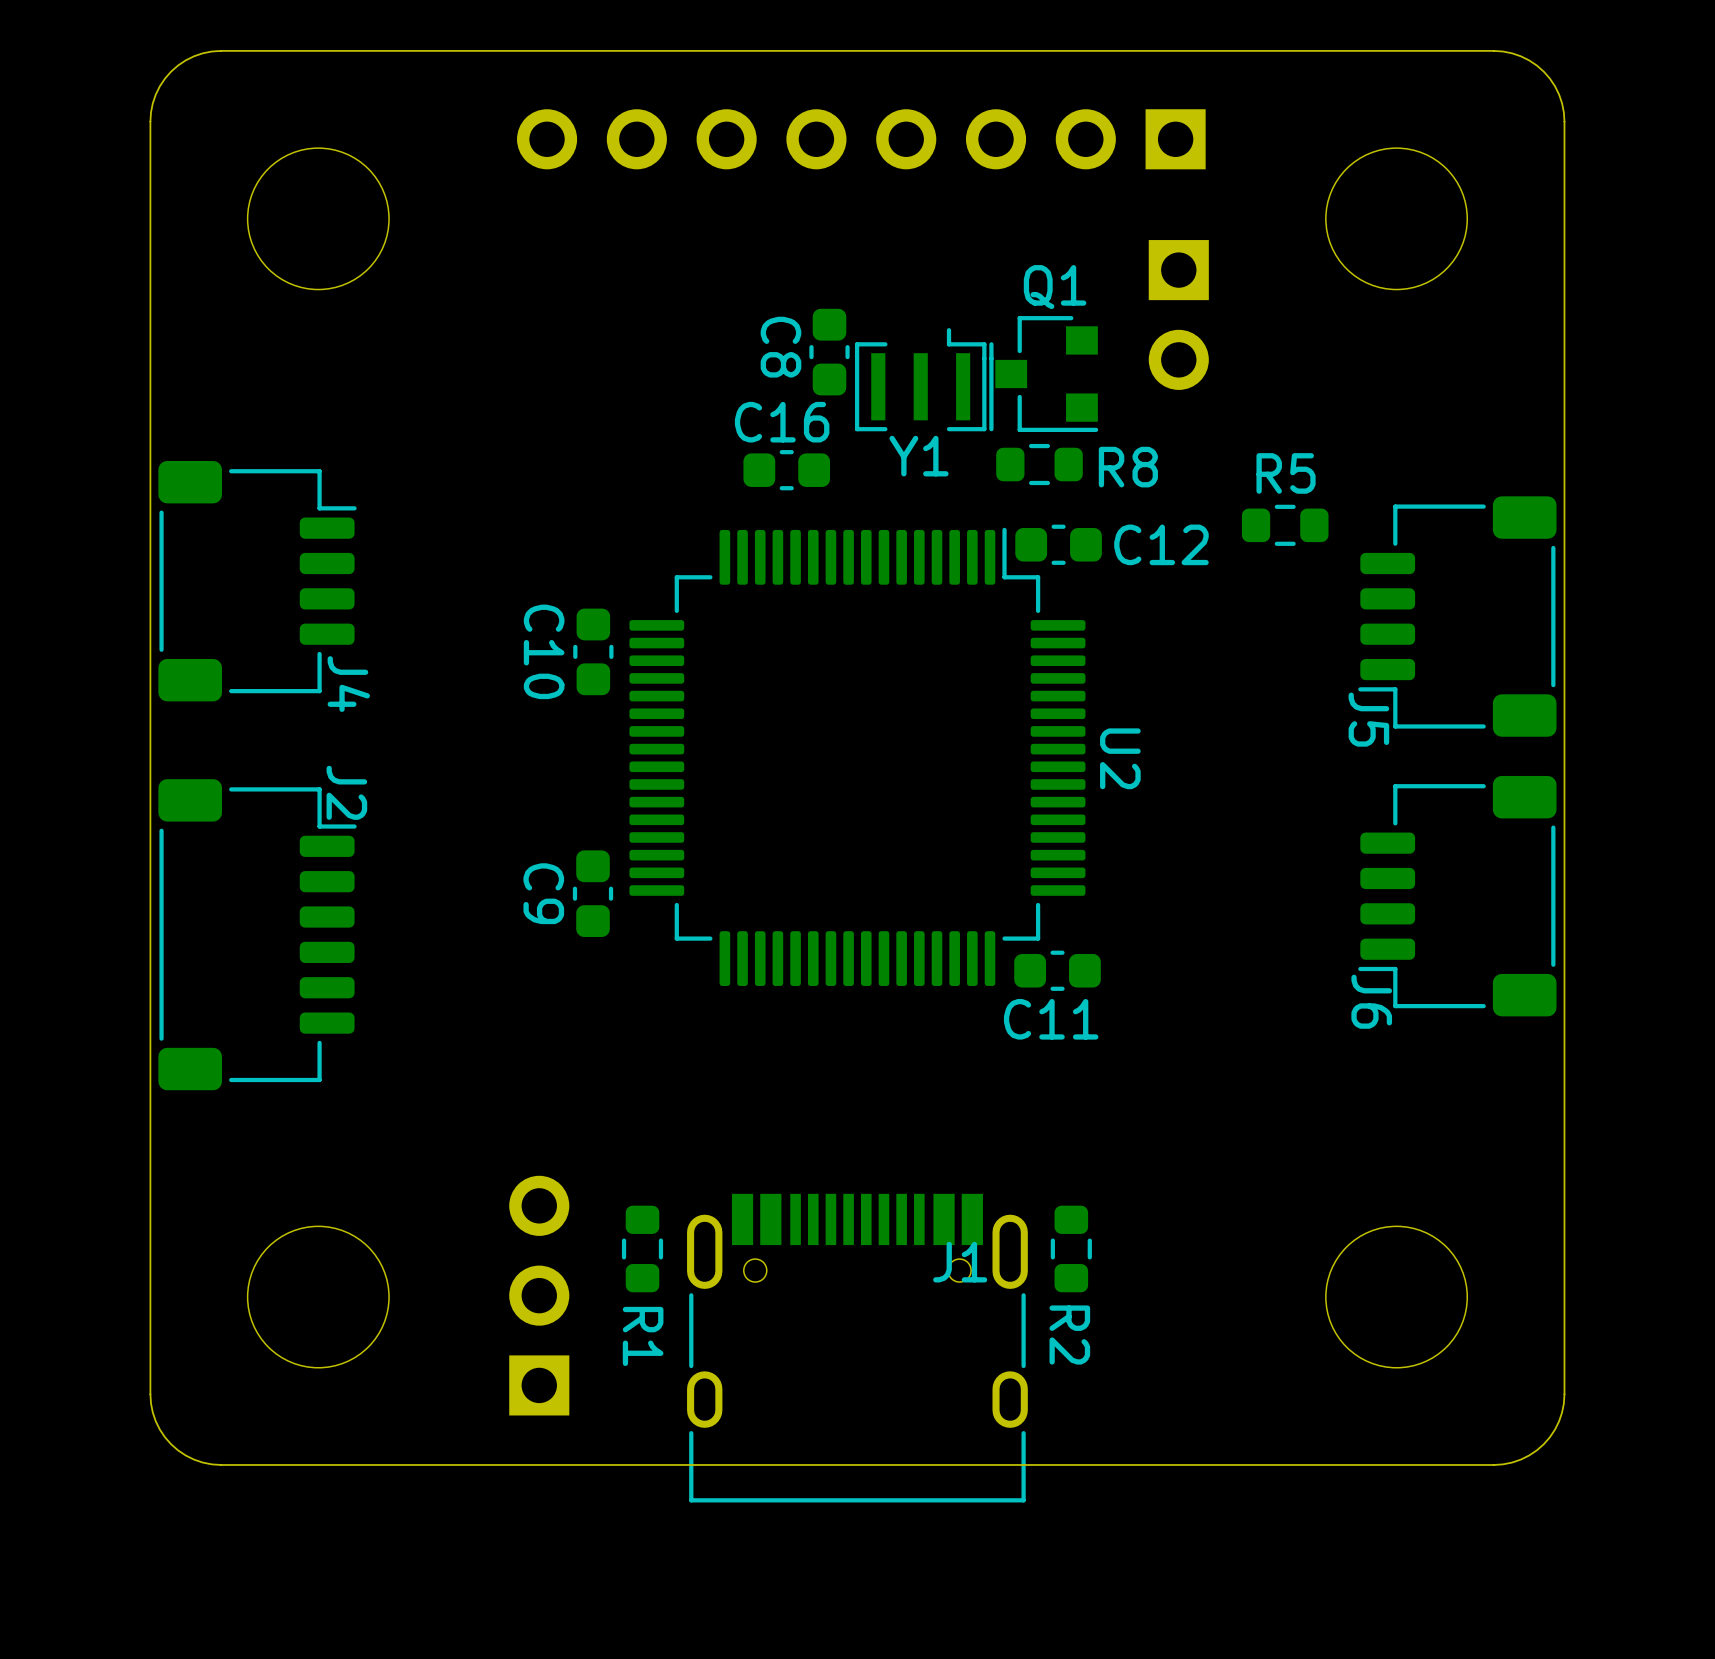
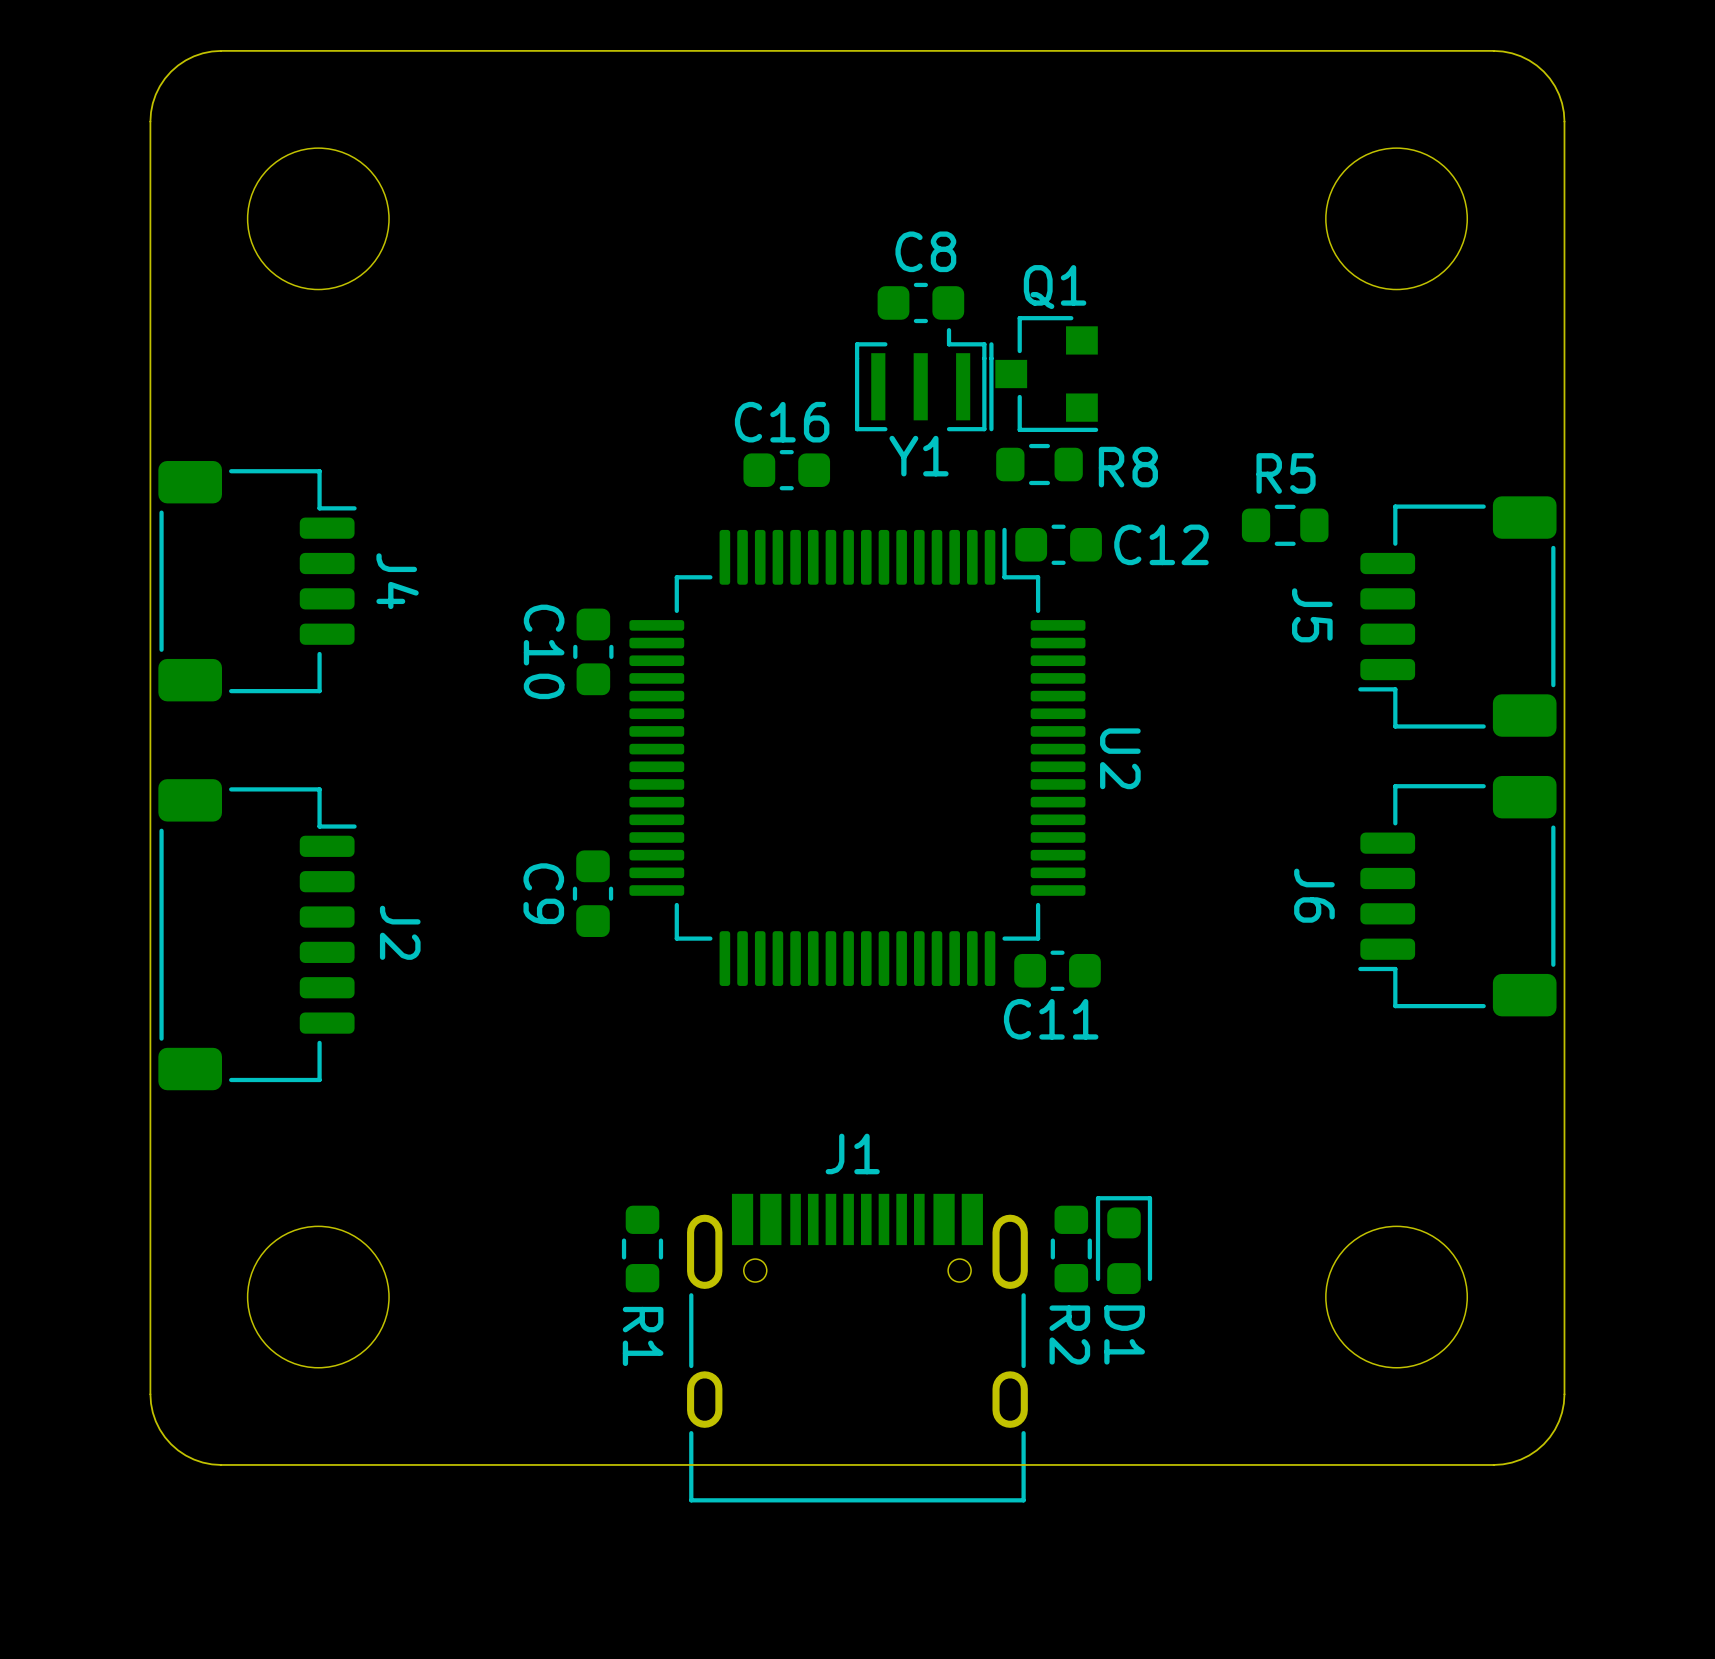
part: (861, 139) -> none
part: (1178, 314) -> none
C8 rotation: 0° (829, 352) -> 90° clockwise (920, 302)
C8 position: (829, 352) -> (920, 302)
J4 name position: J4 (348, 684) -> J4 (397, 581)
J5 name position: J5 (1368, 719) -> J5 (1312, 615)
J2 name position: J2 (346, 792) -> J2 (400, 932)
J6 name position: J6 (1371, 1001) -> J6 (1314, 895)
D1: none -> (1124, 1245)
J1 name position: J1 (960, 1262) -> J1 (852, 1153)
part: (539, 1295) -> none

